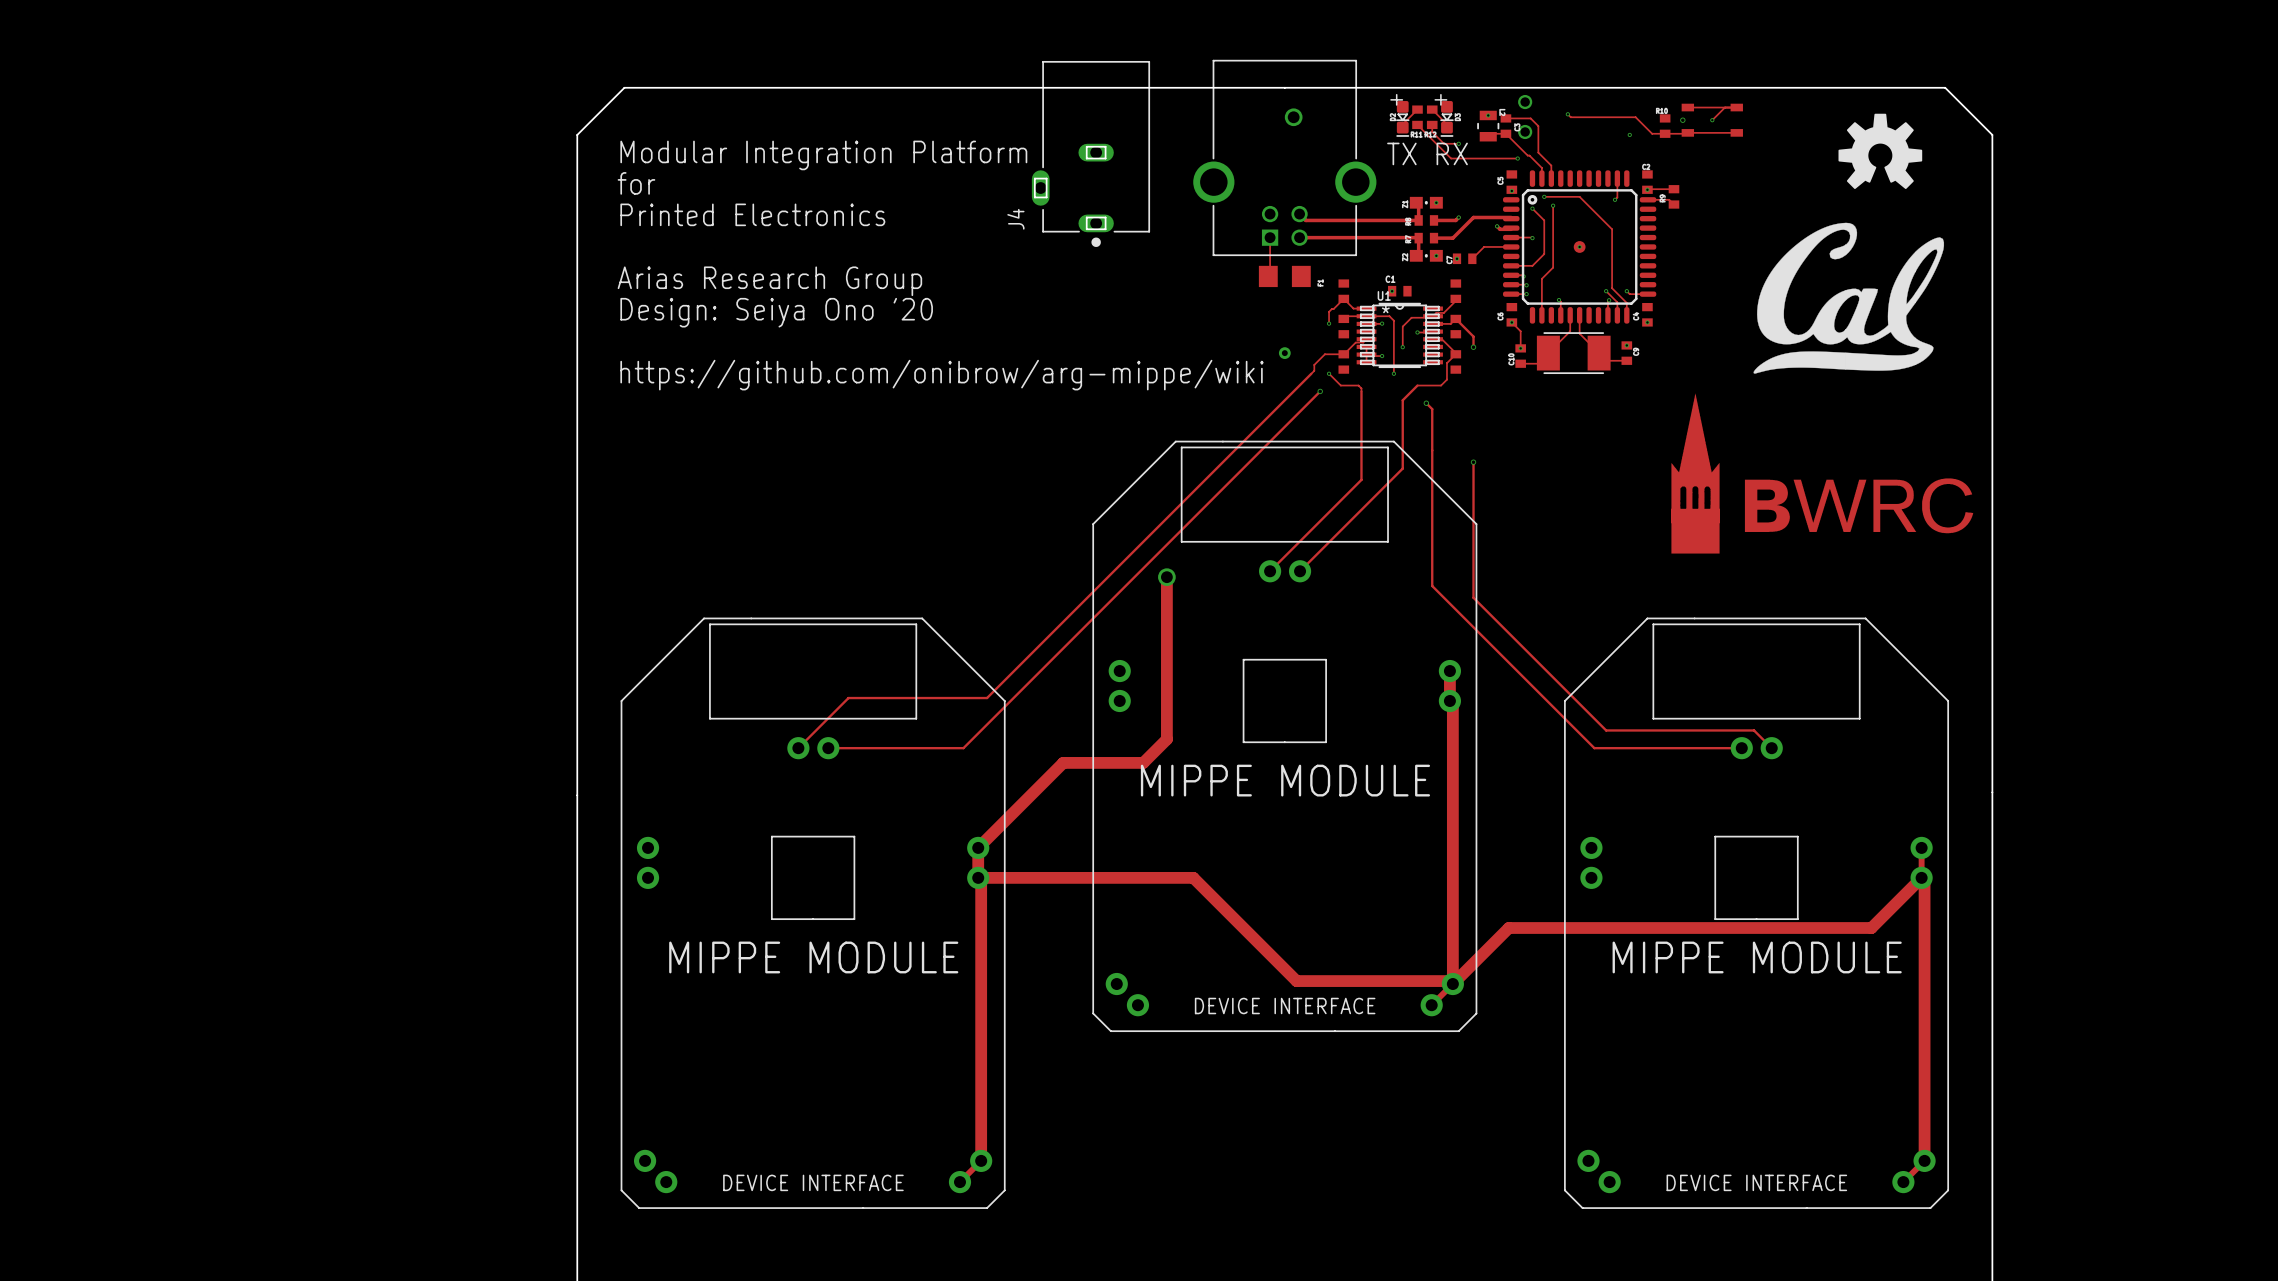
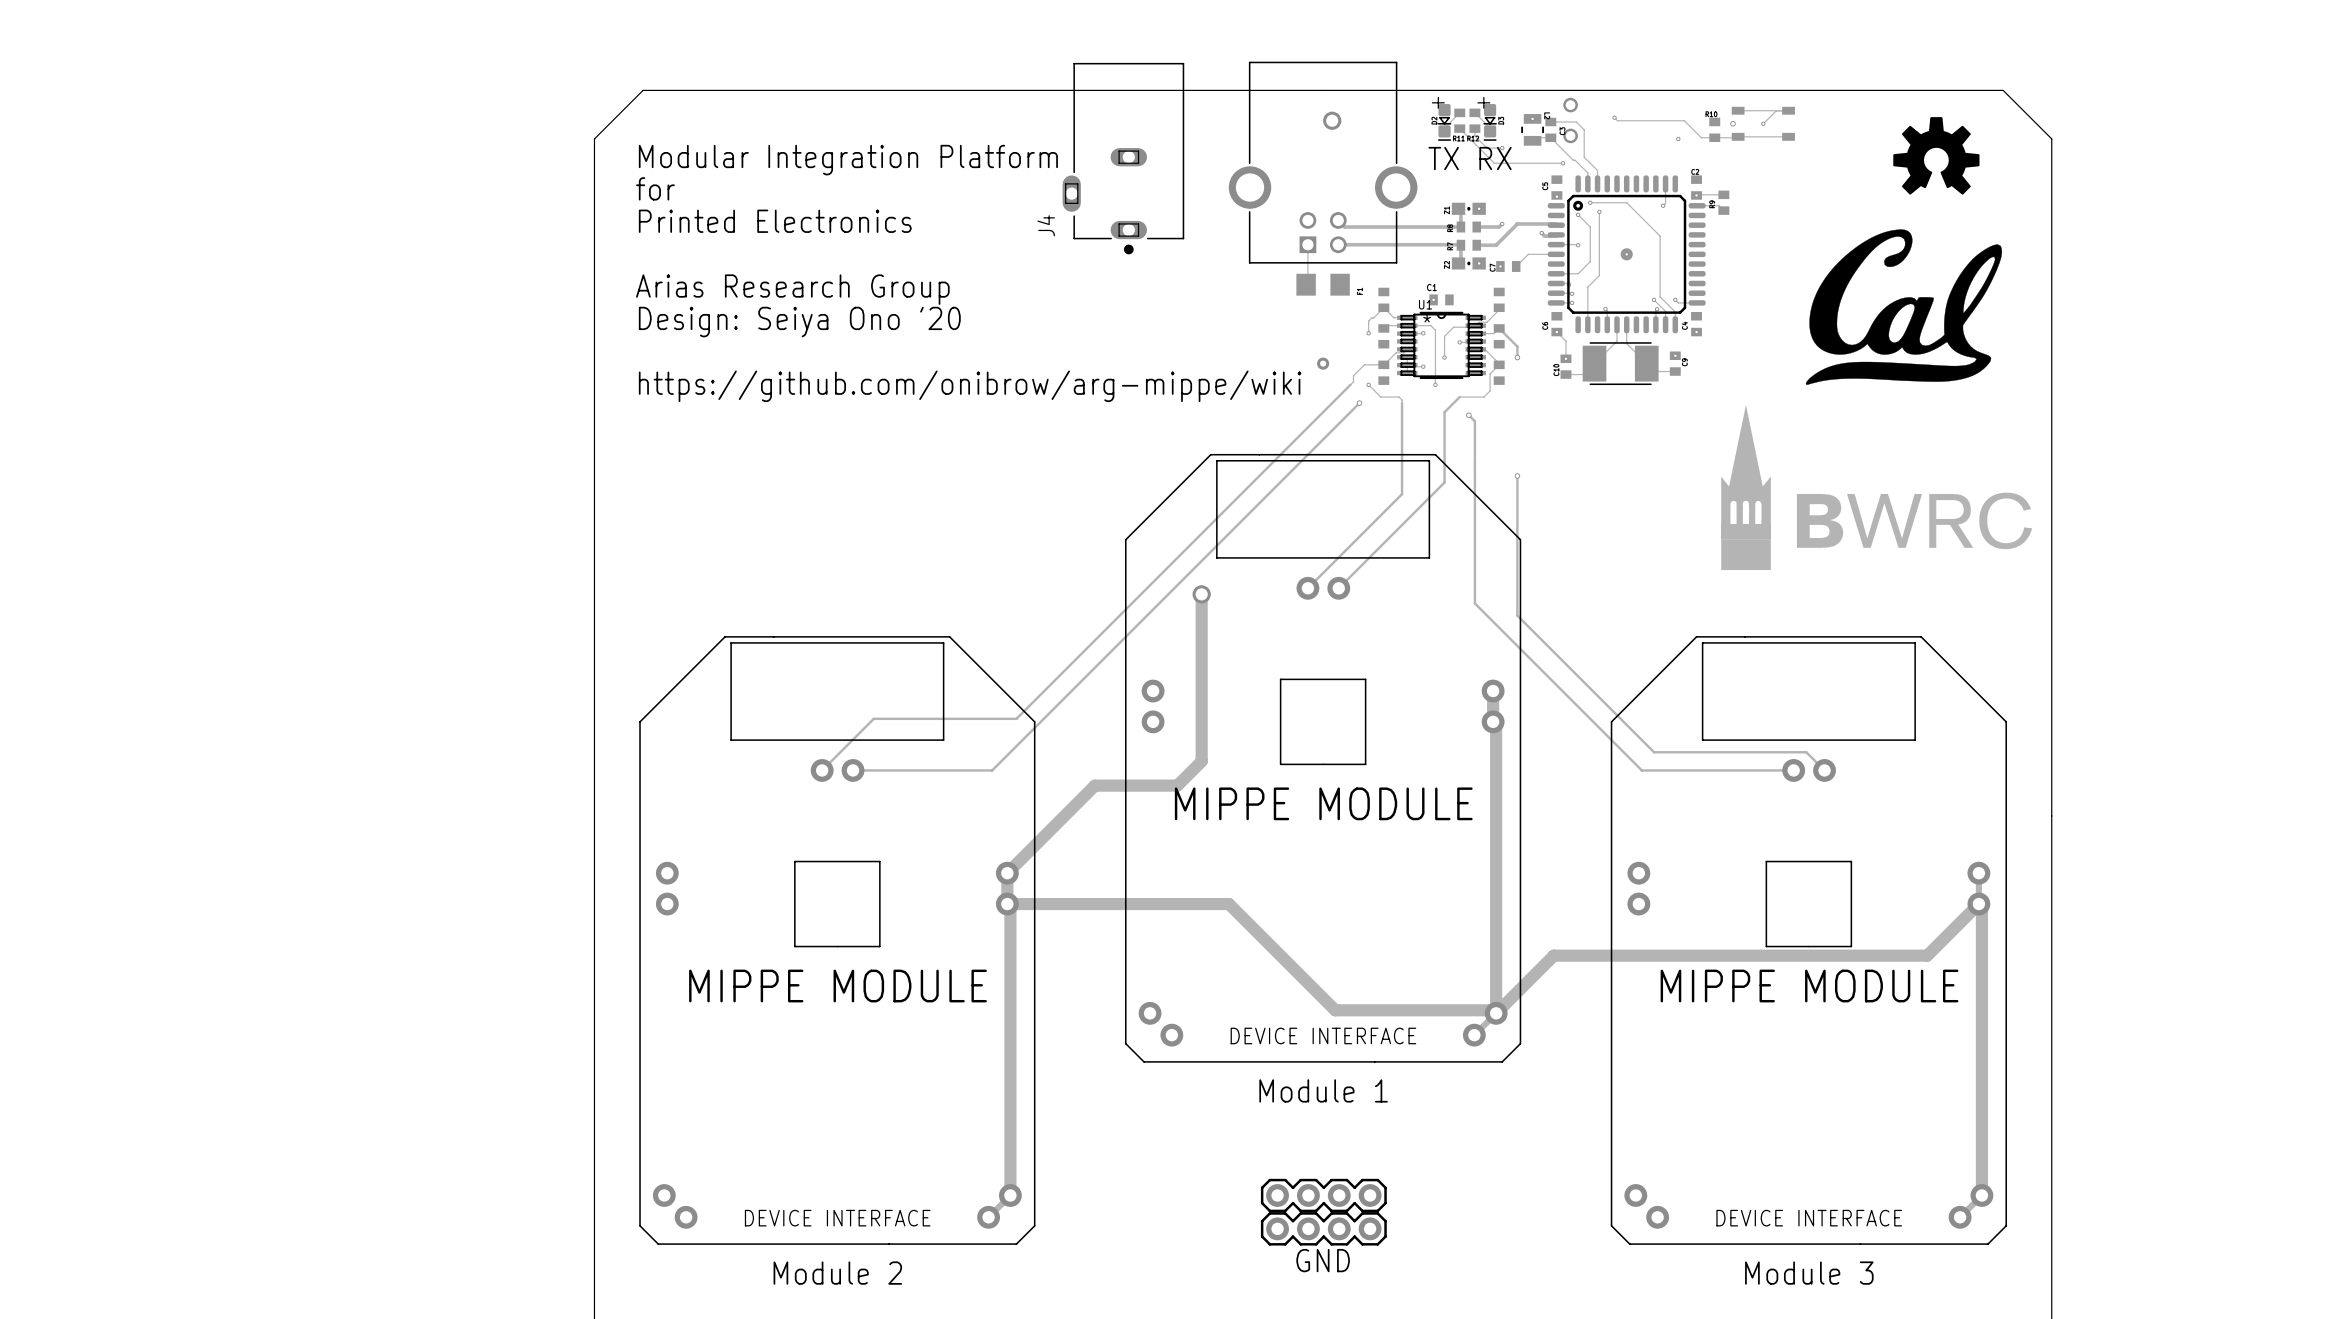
text: none -> Module 1 (1323, 1090)
part: none -> (1323, 1195)
part: none -> (1323, 1228)
text: none -> GND (1323, 1260)
text: none -> Module 2 (837, 1273)
text: none -> Module 3 (1809, 1273)

